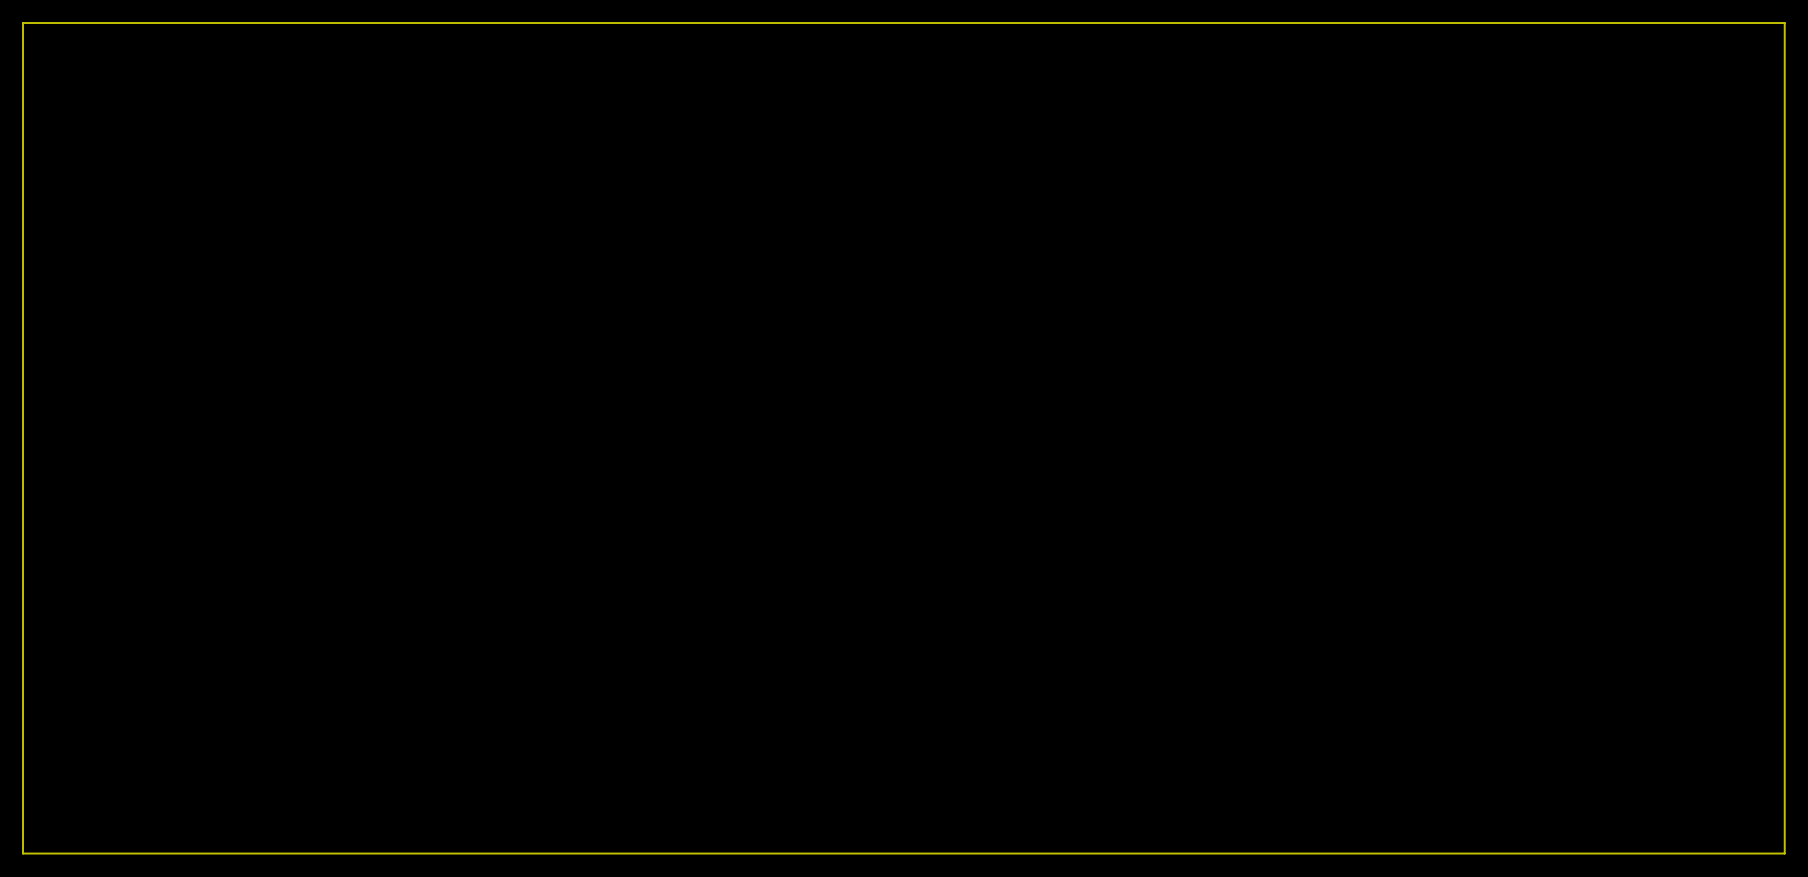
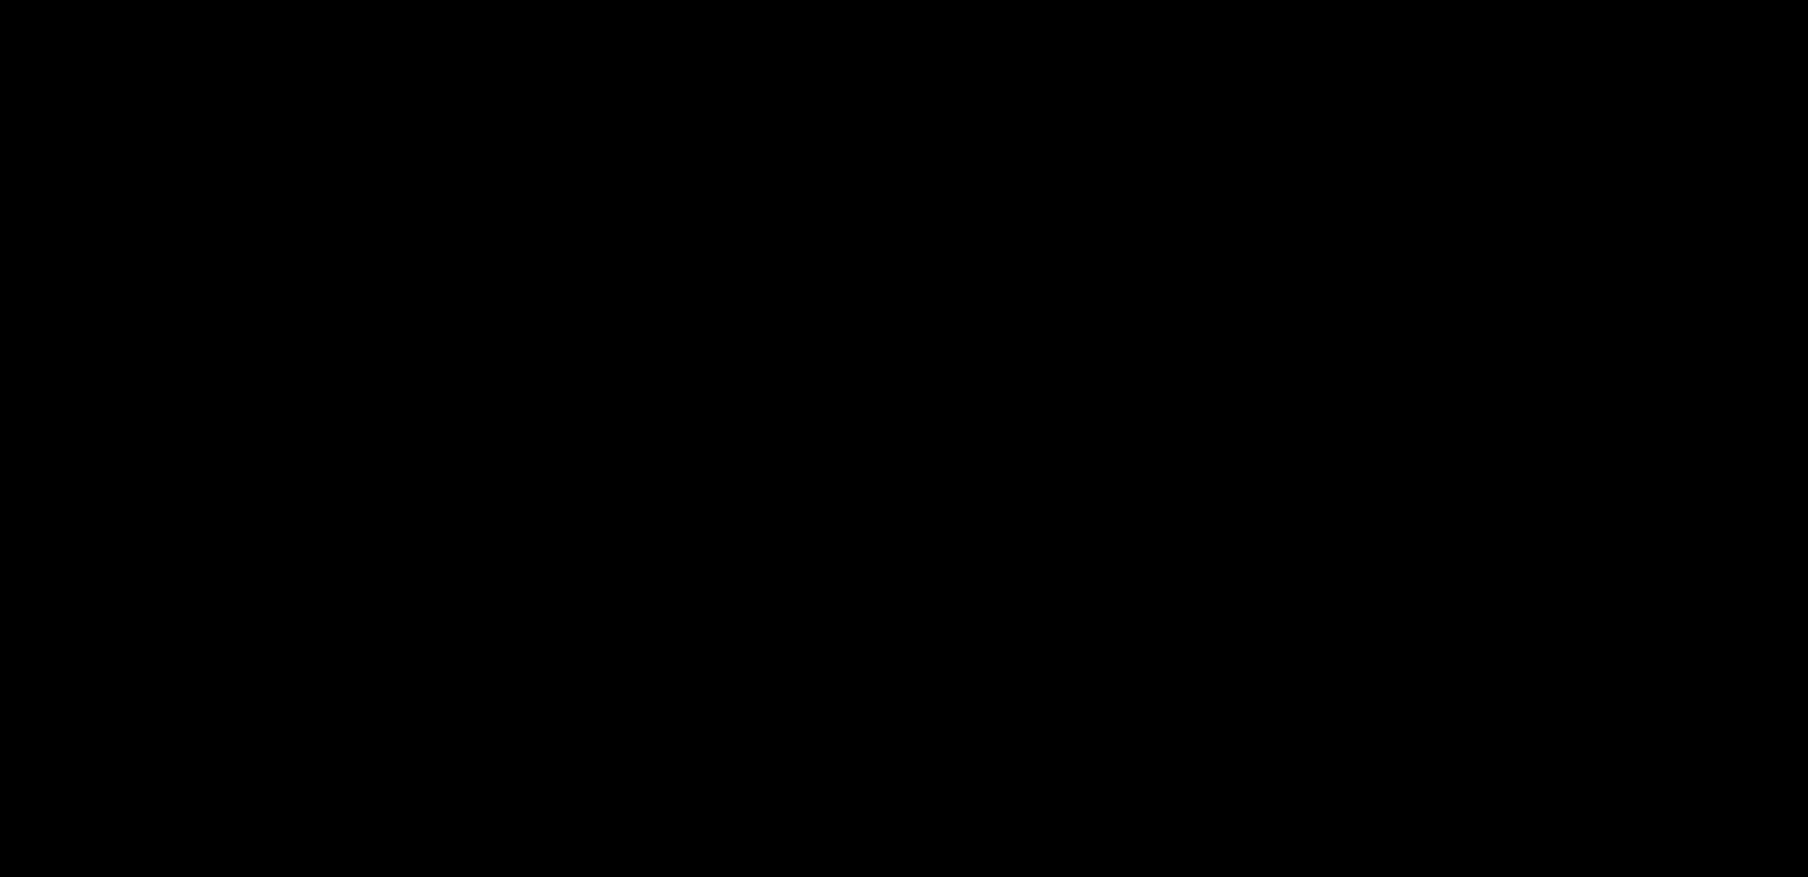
board edge: (1784, 23) (23, 23) (23, 853) (1784, 853) (1784, 23) -> none

